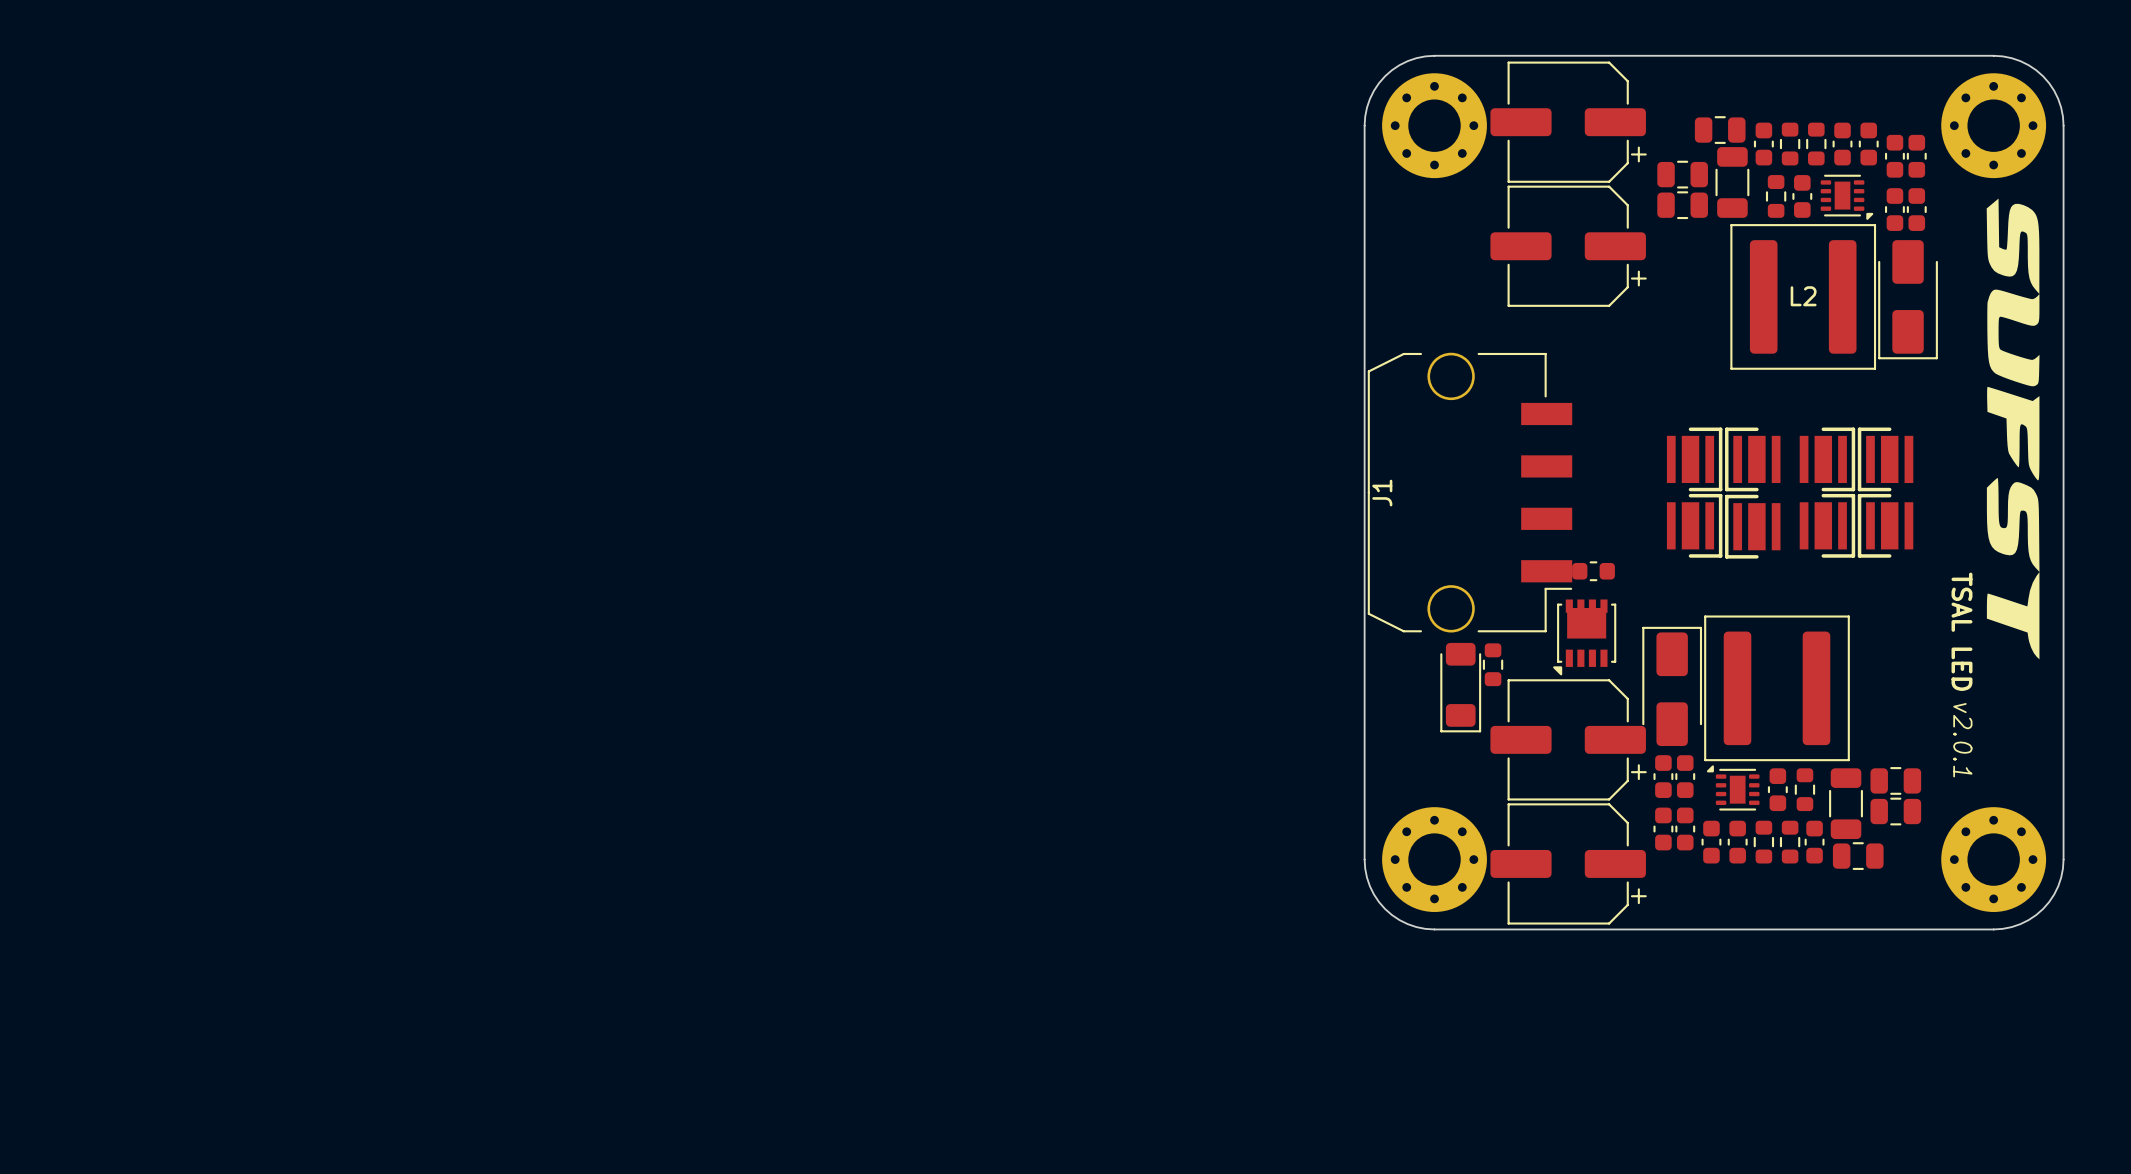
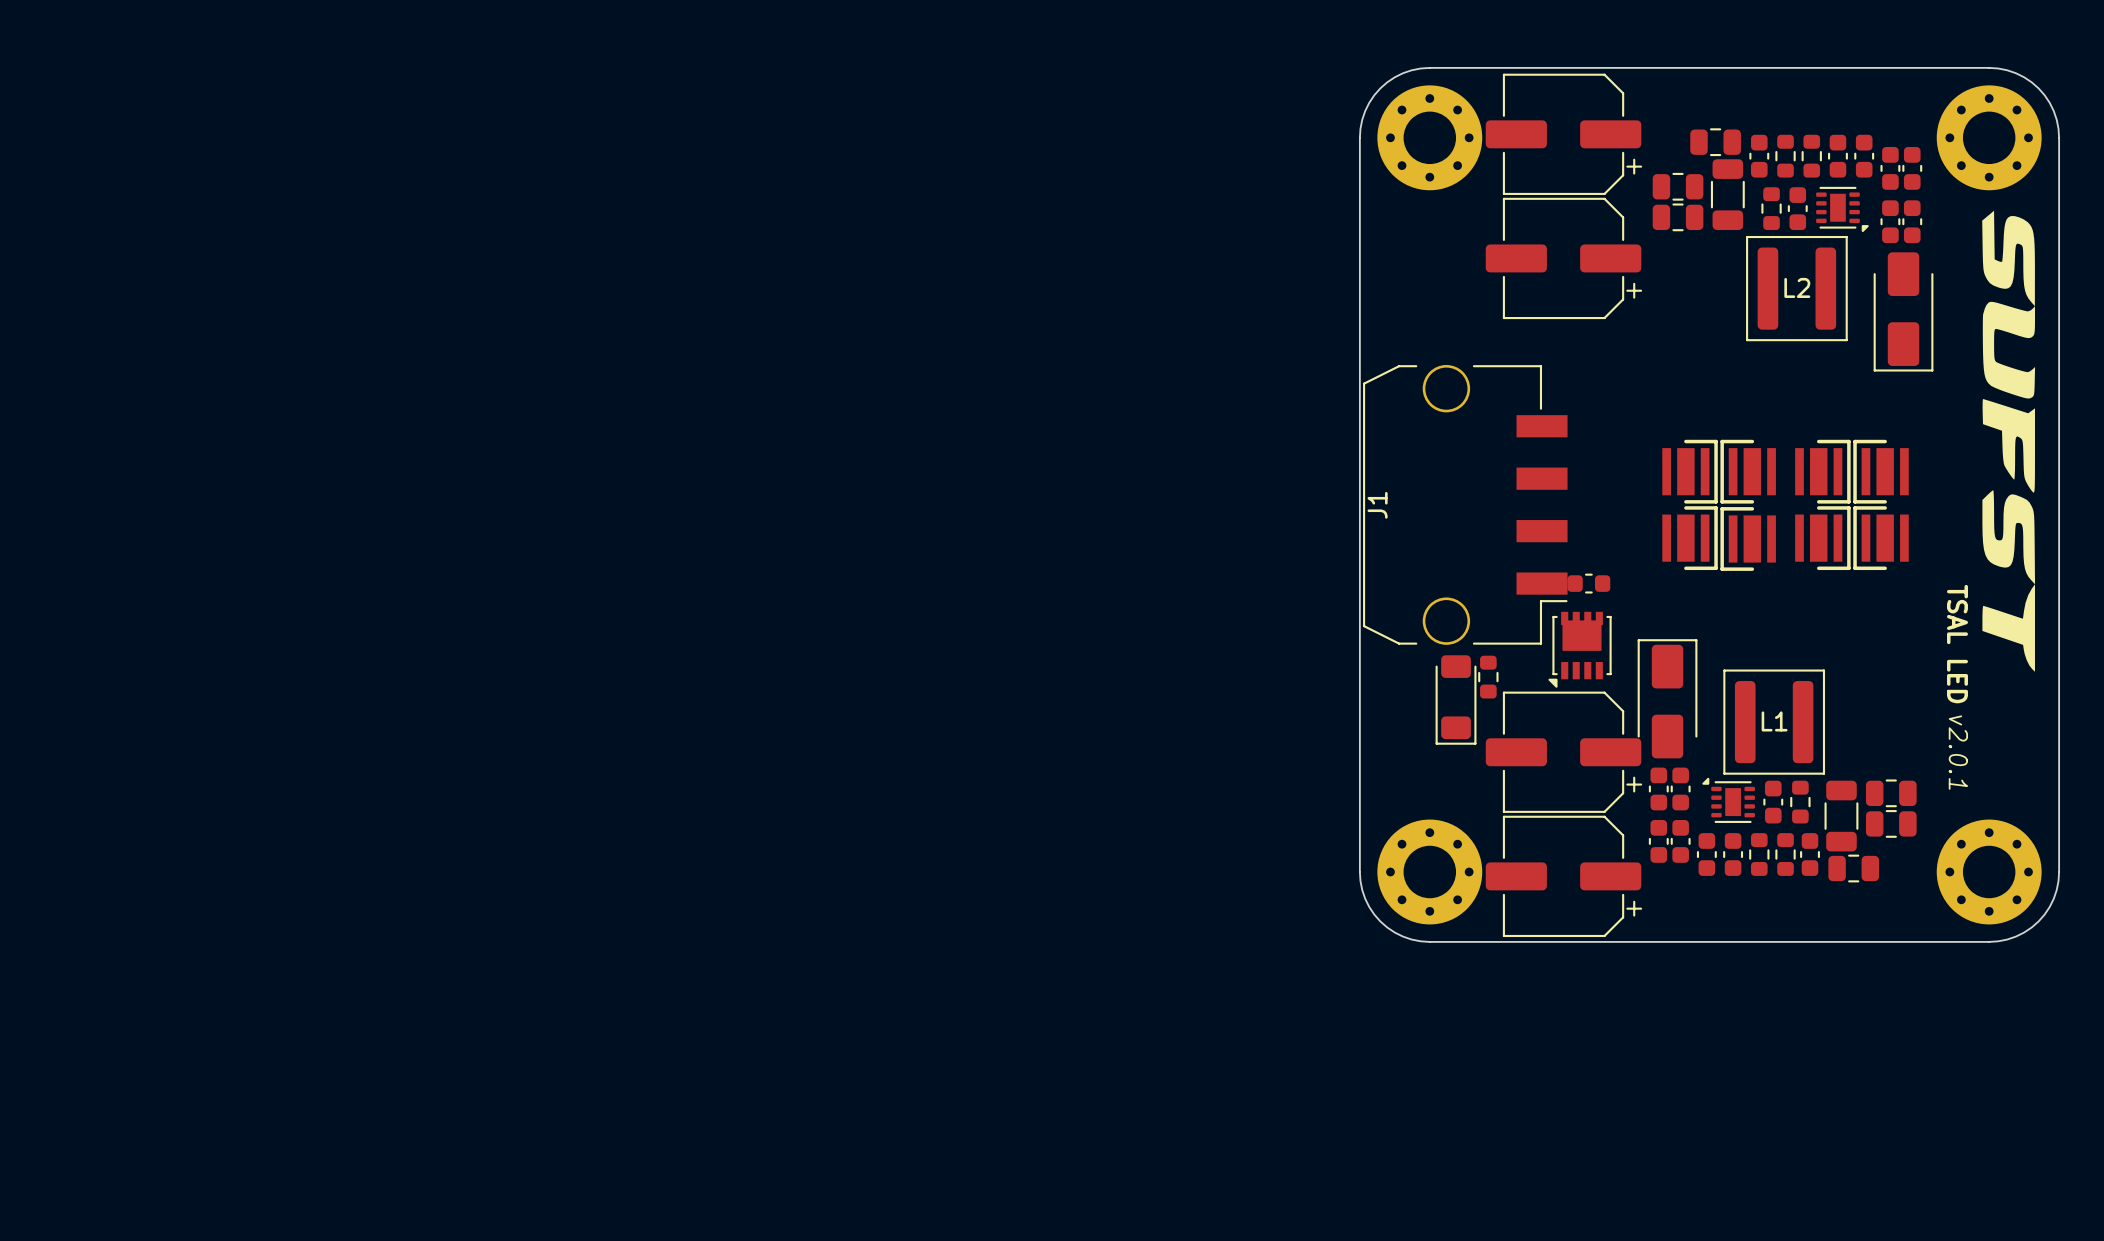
L2 footprint: [1730, 224, 1877, 370] -> [1746, 235, 1848, 342]
part: (1776, 688) -> none
L1: none -> (1774, 722)

